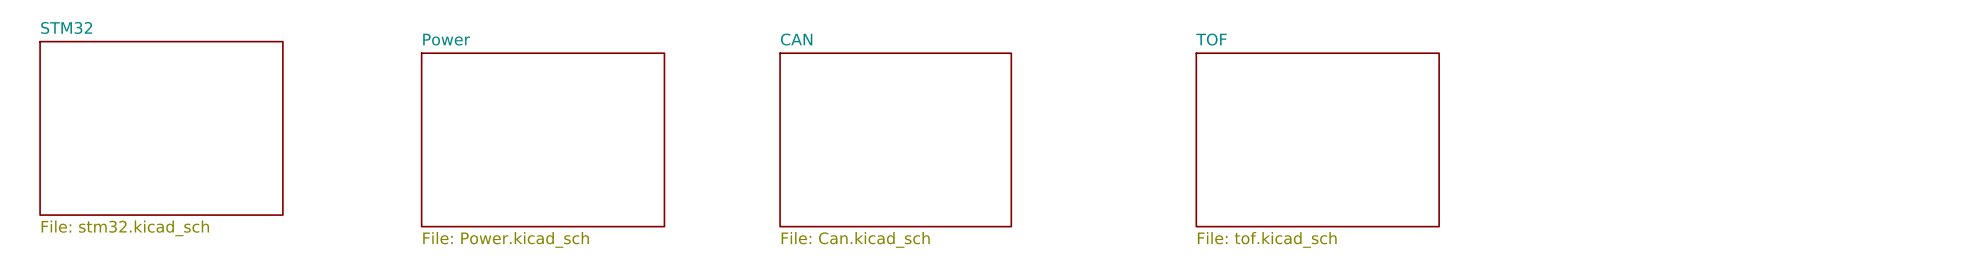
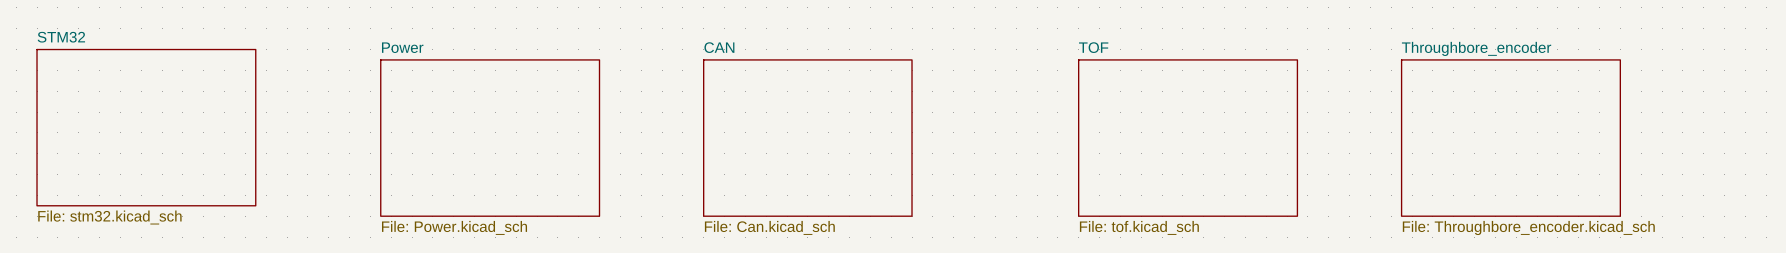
sheet Throughbore_encoder: none -> File: Throughbore_encoder.kicad_sch (1510, 138)

